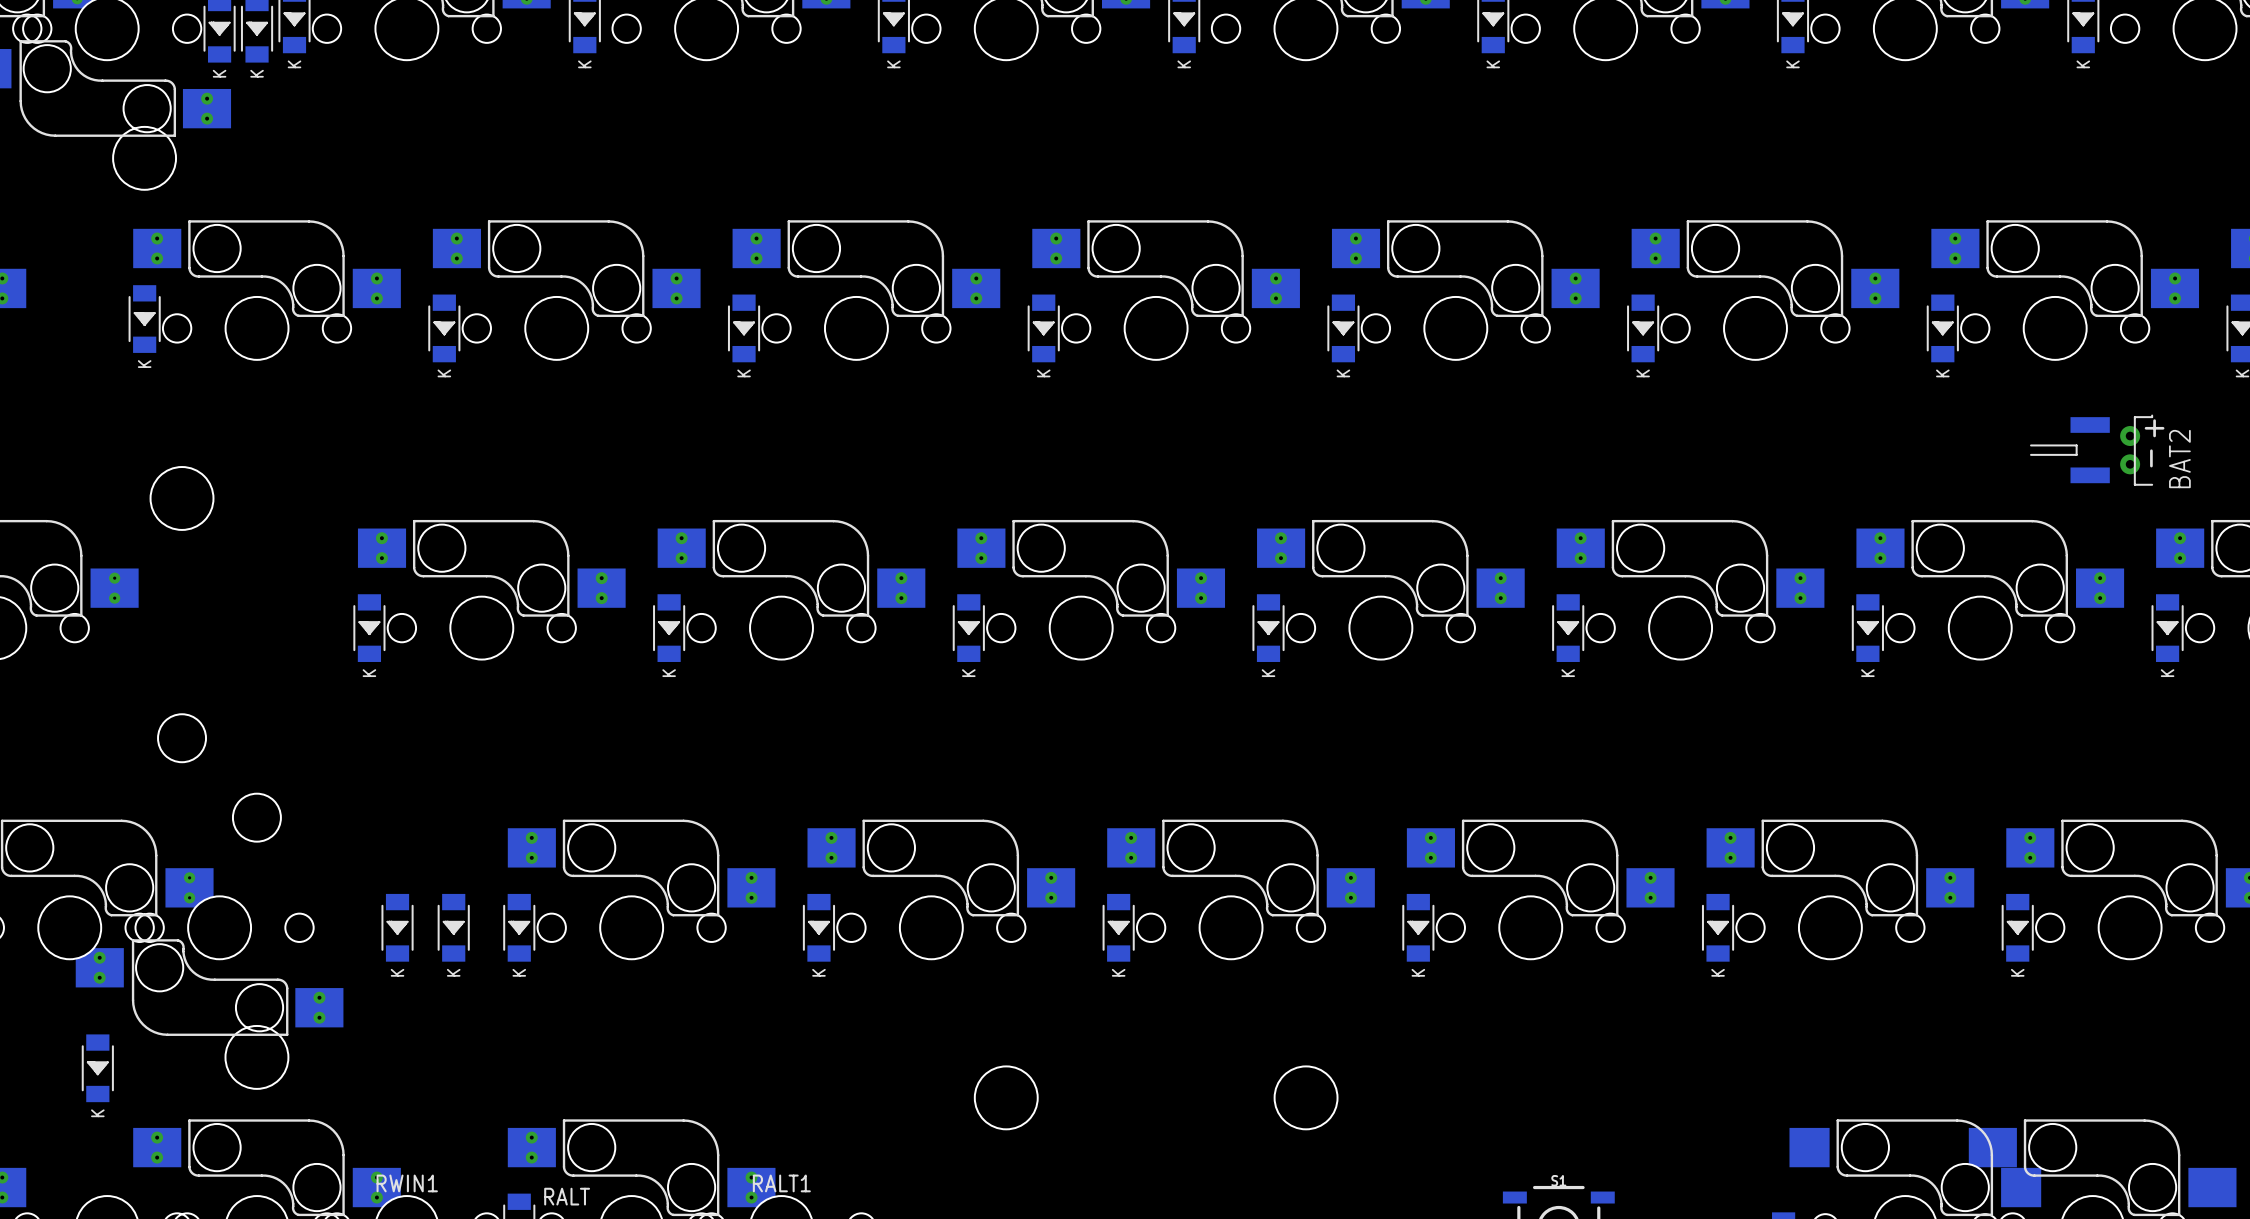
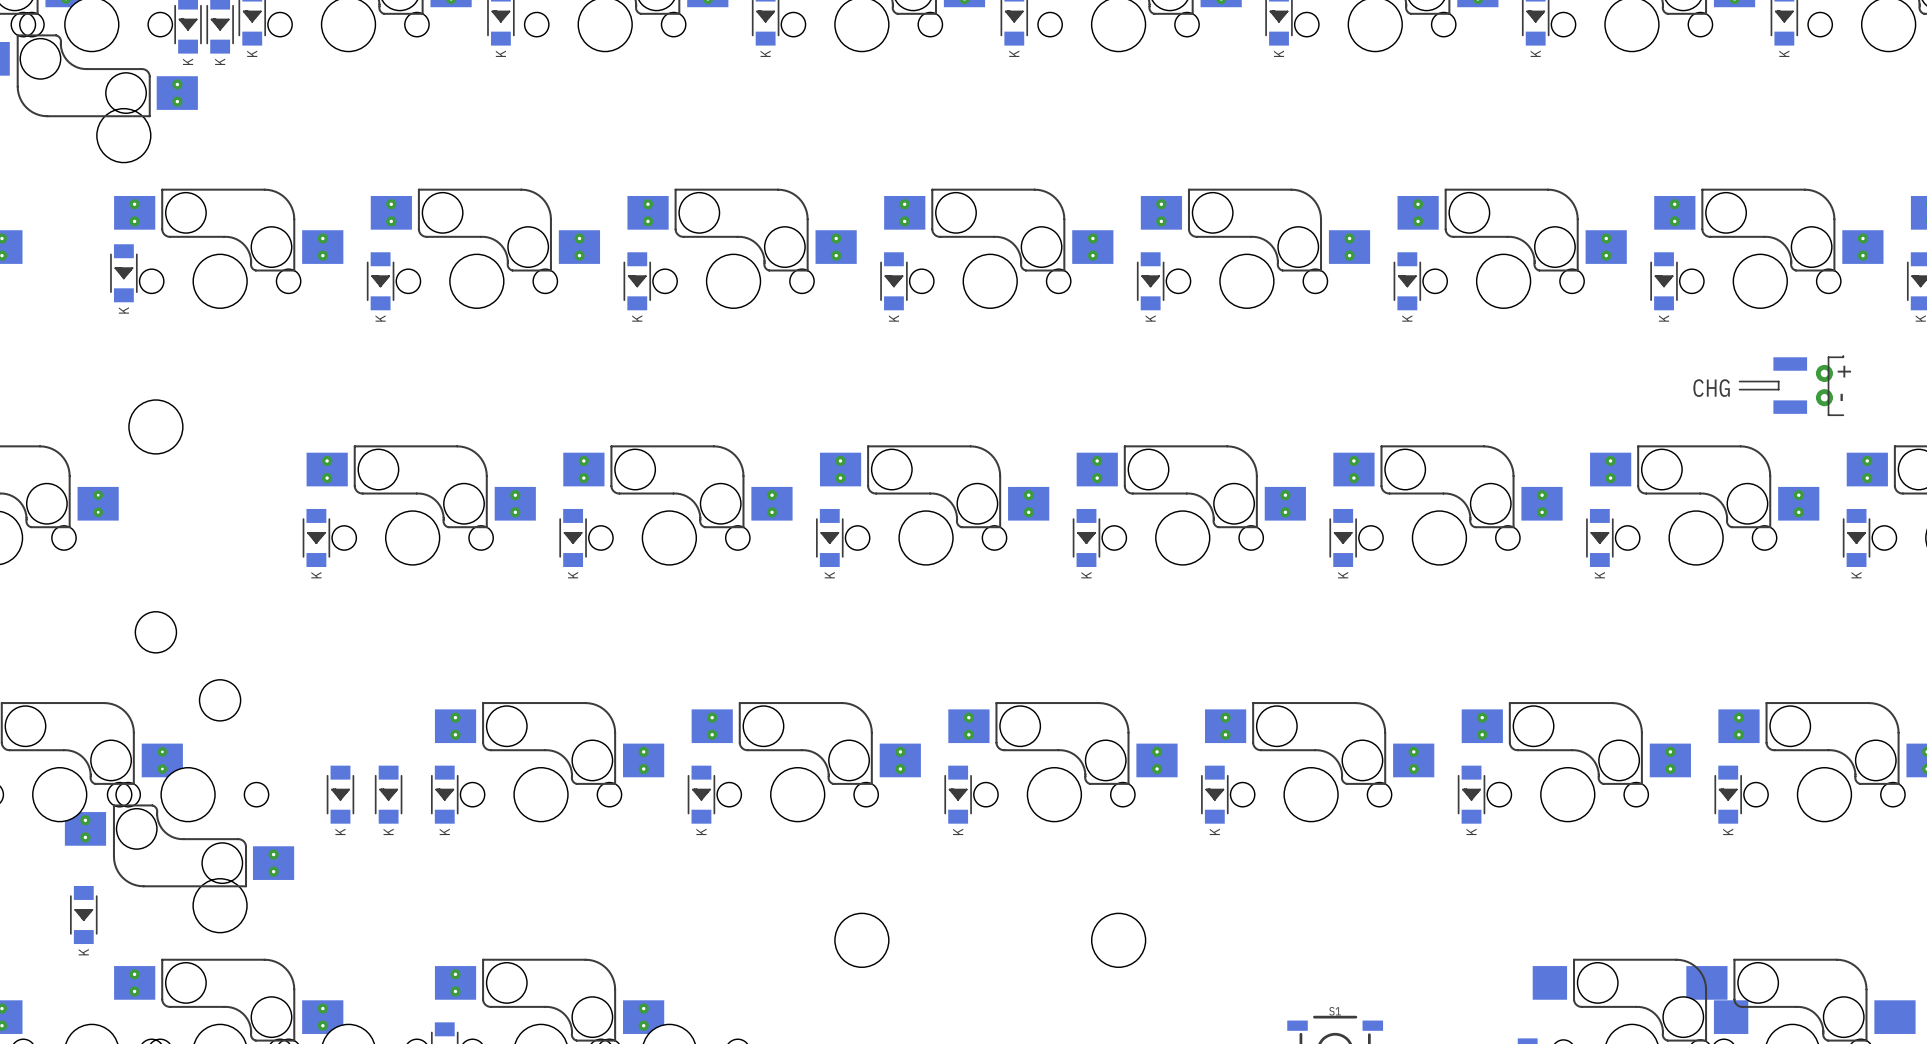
BAT2 name: BAT2 (2179, 459) -> CHG (1711, 388)
RWIN1 name: RWIN1 (407, 1183) -> none
RALT1 name: RALT1 (781, 1183) -> none
RALT name: RALT (567, 1196) -> none

